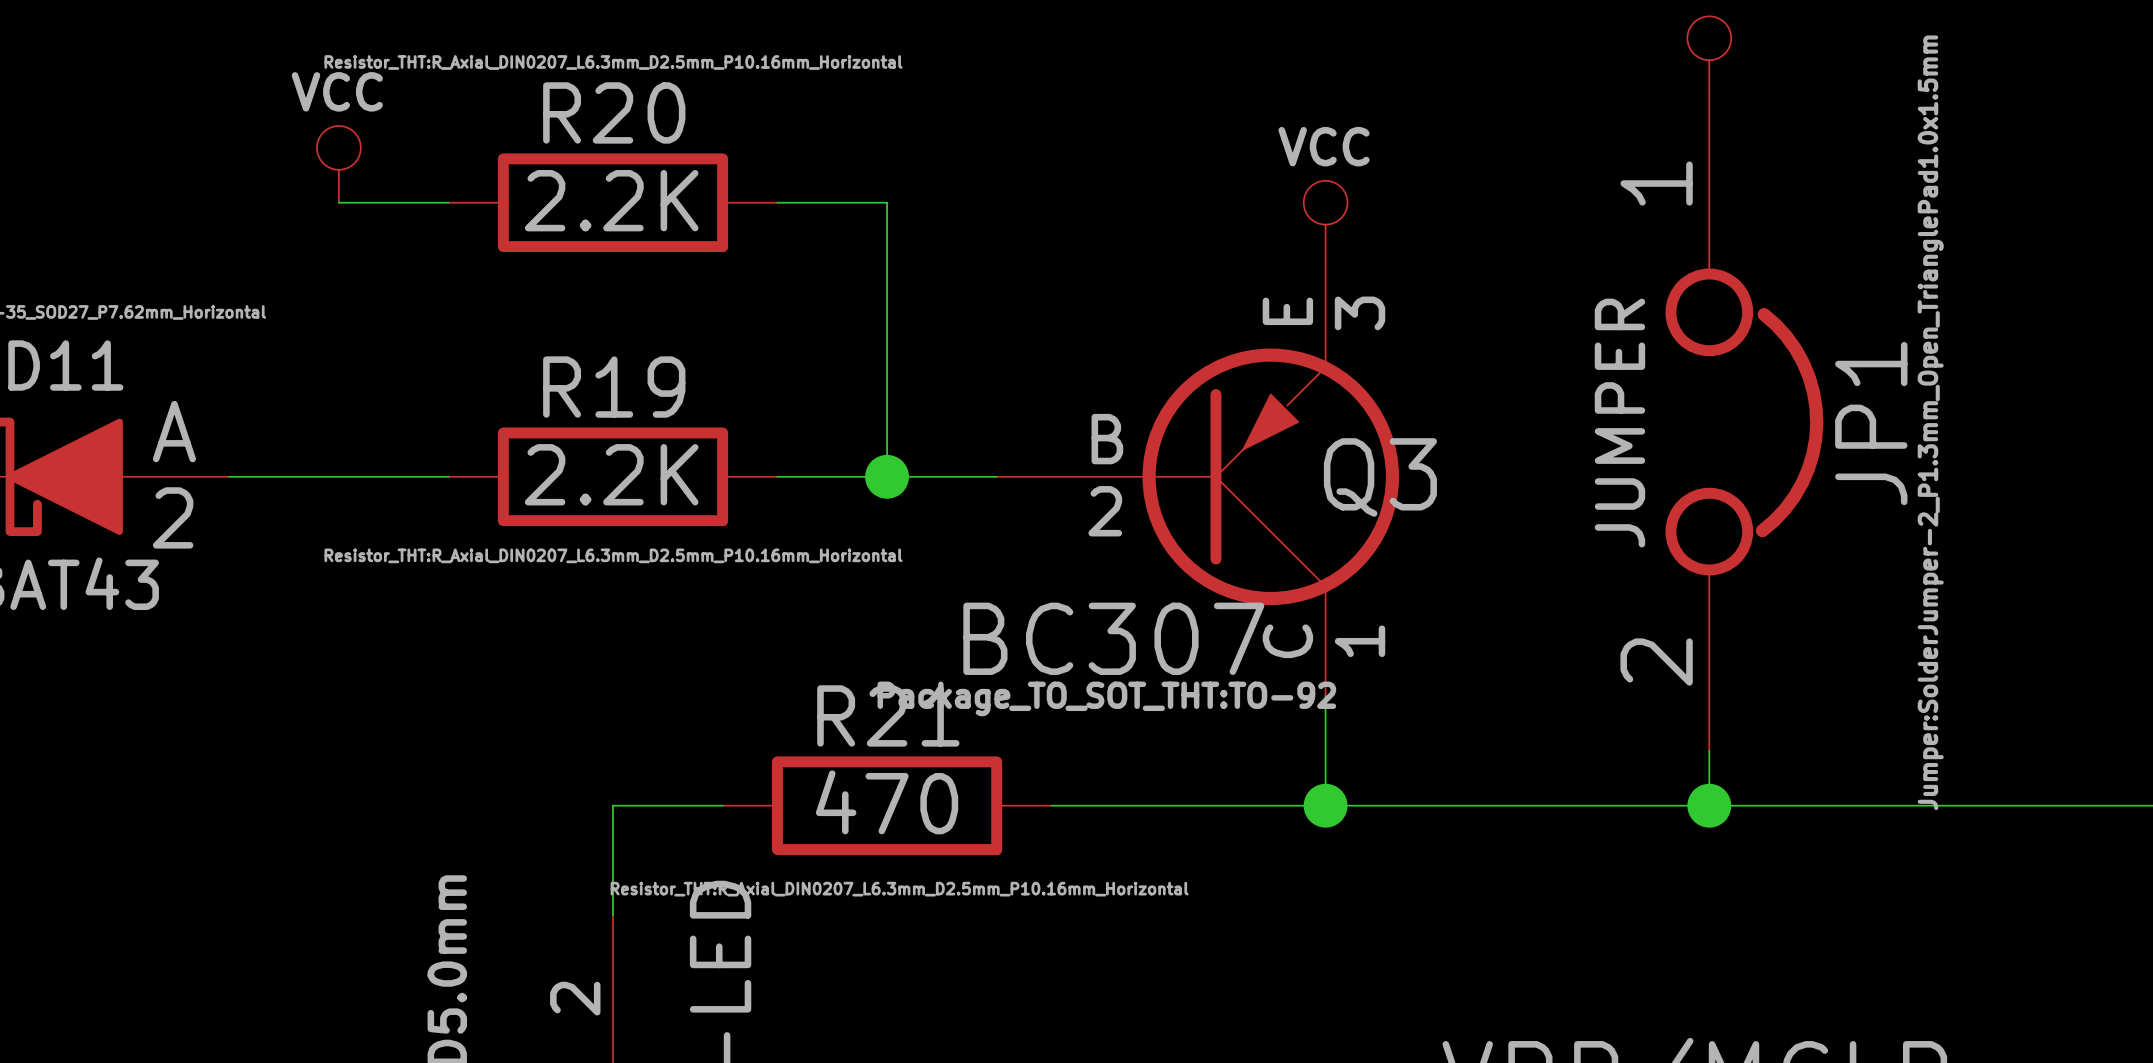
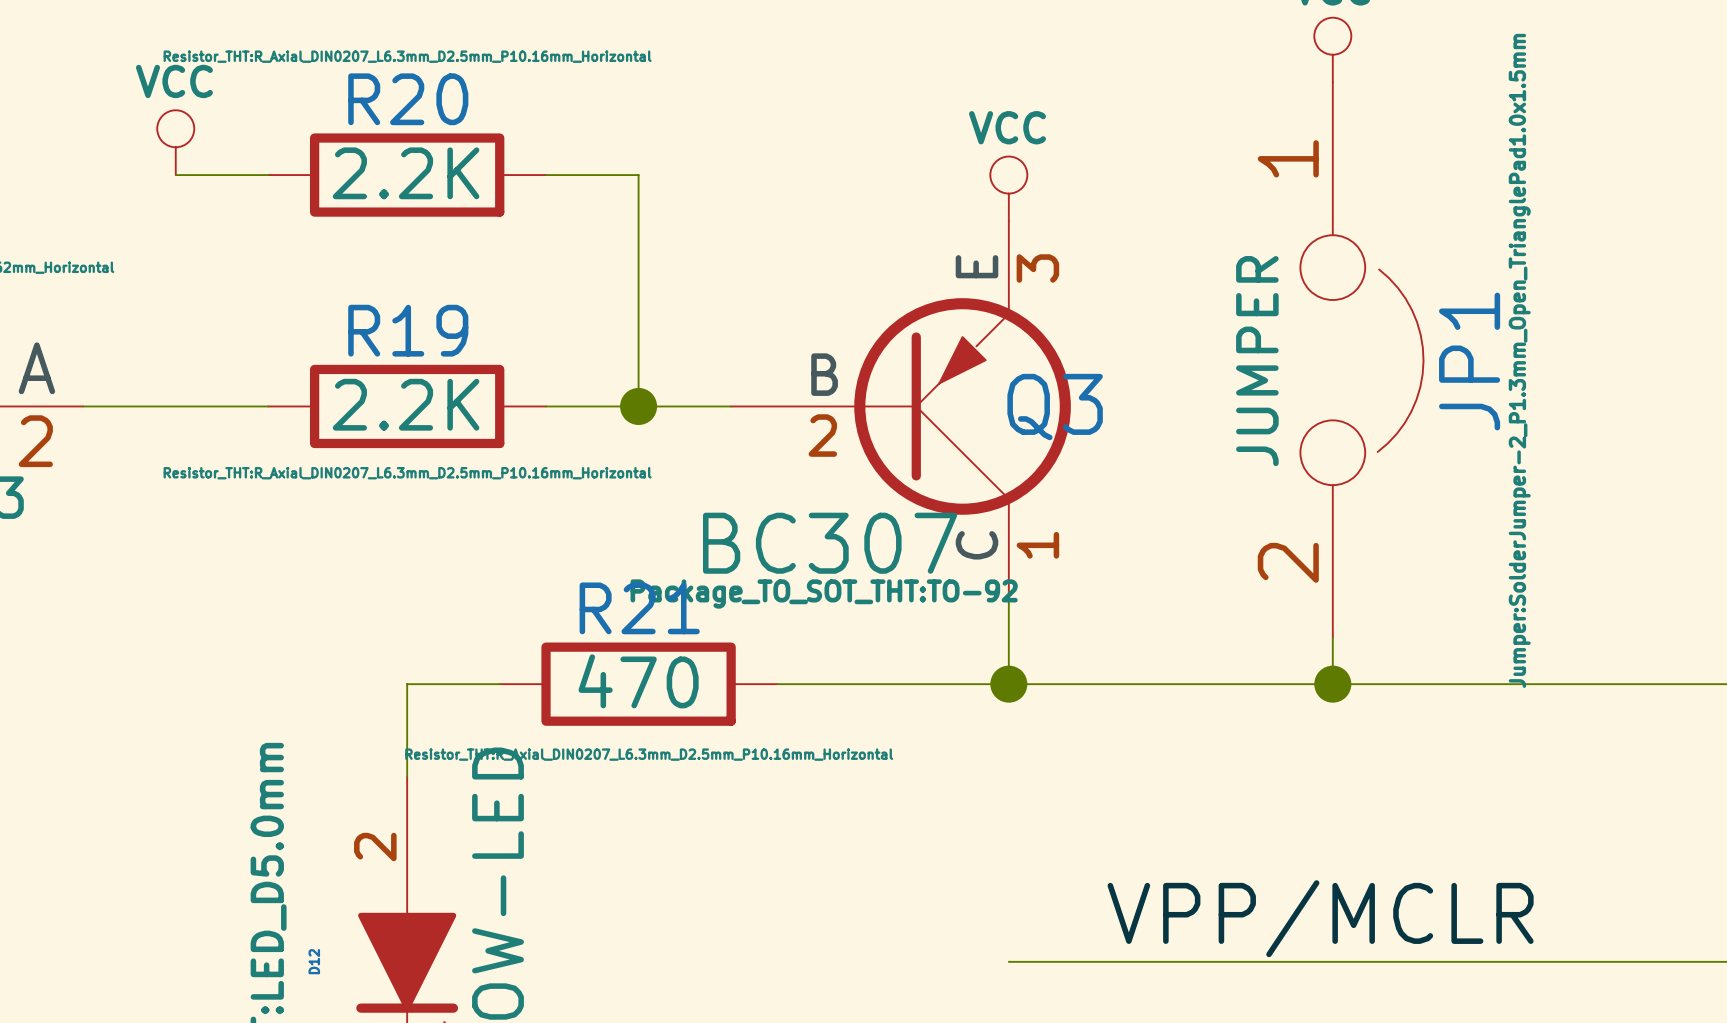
JP1 symbol: [1665, 93, 1824, 751] -> [1300, 82, 1424, 638]

